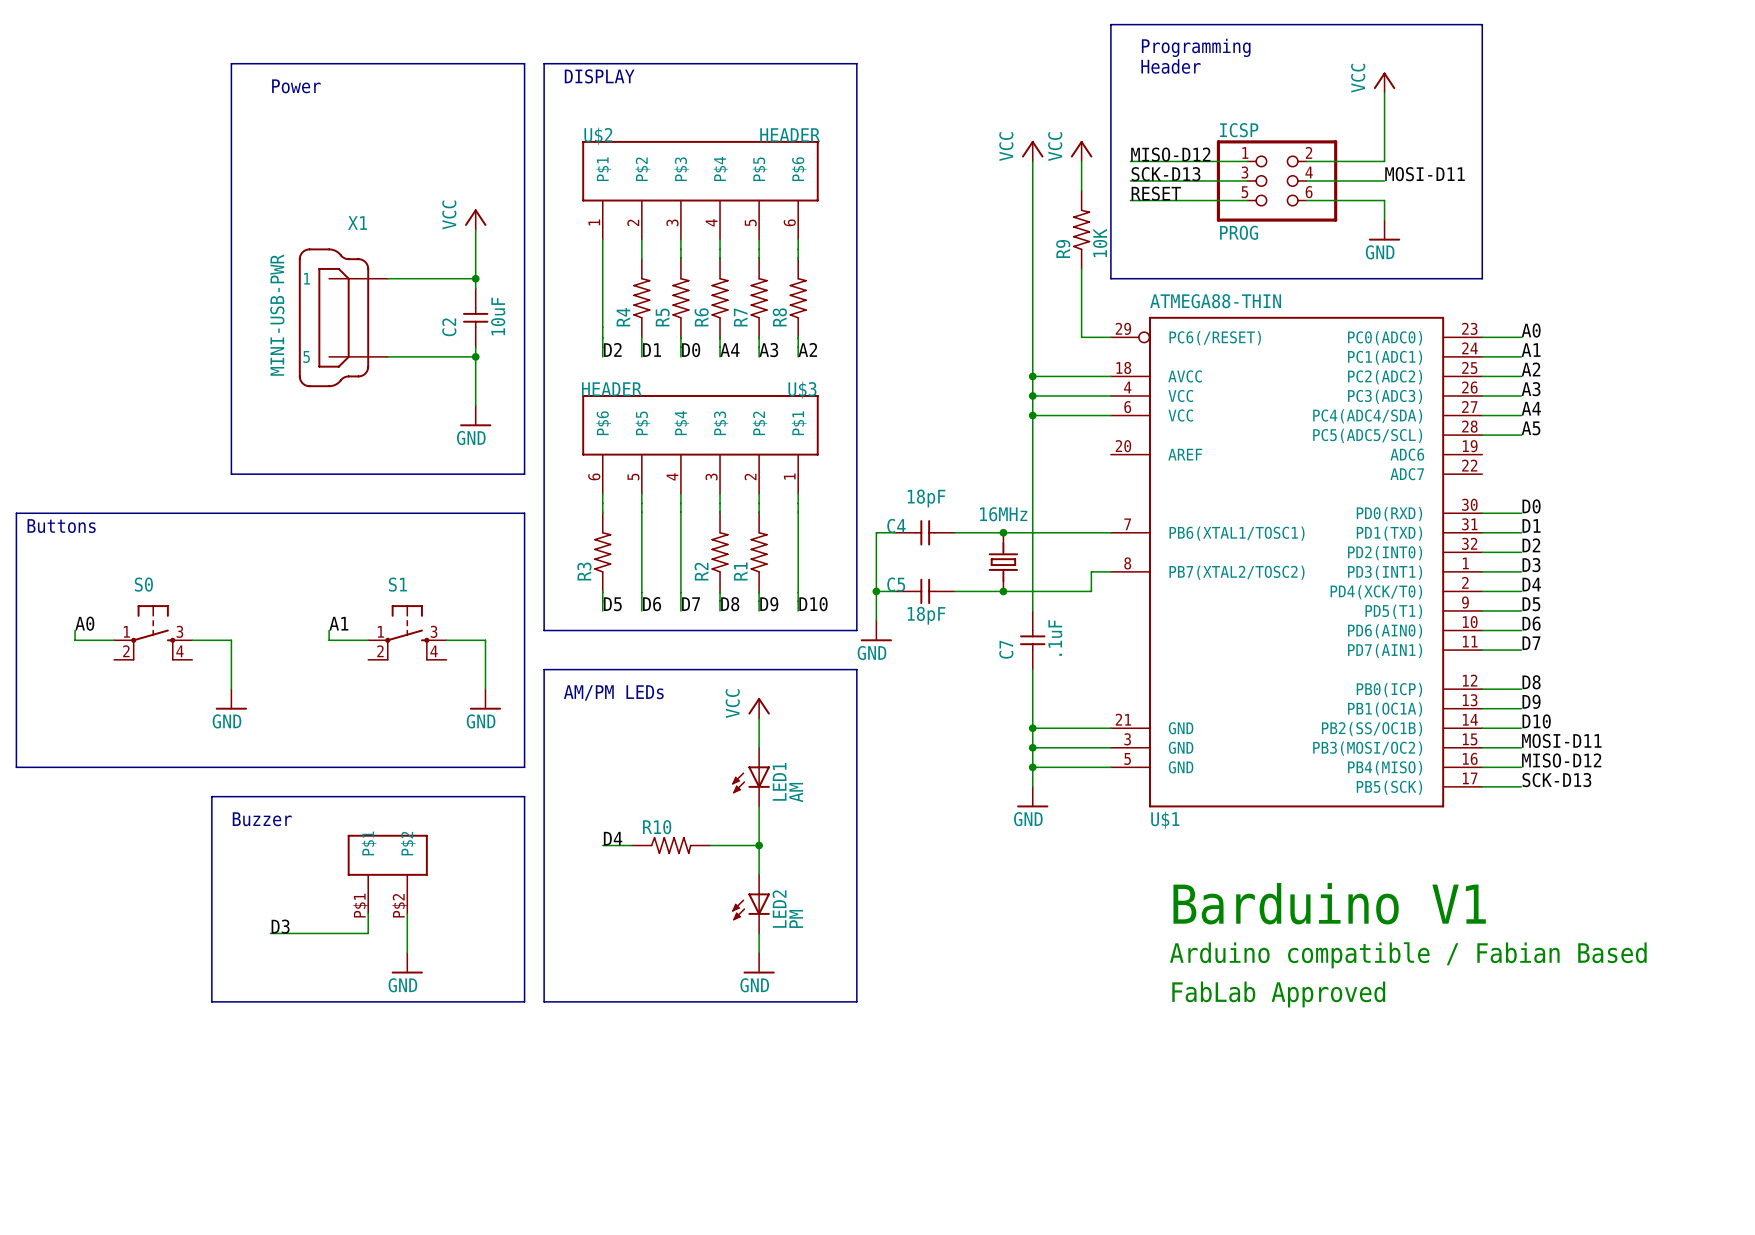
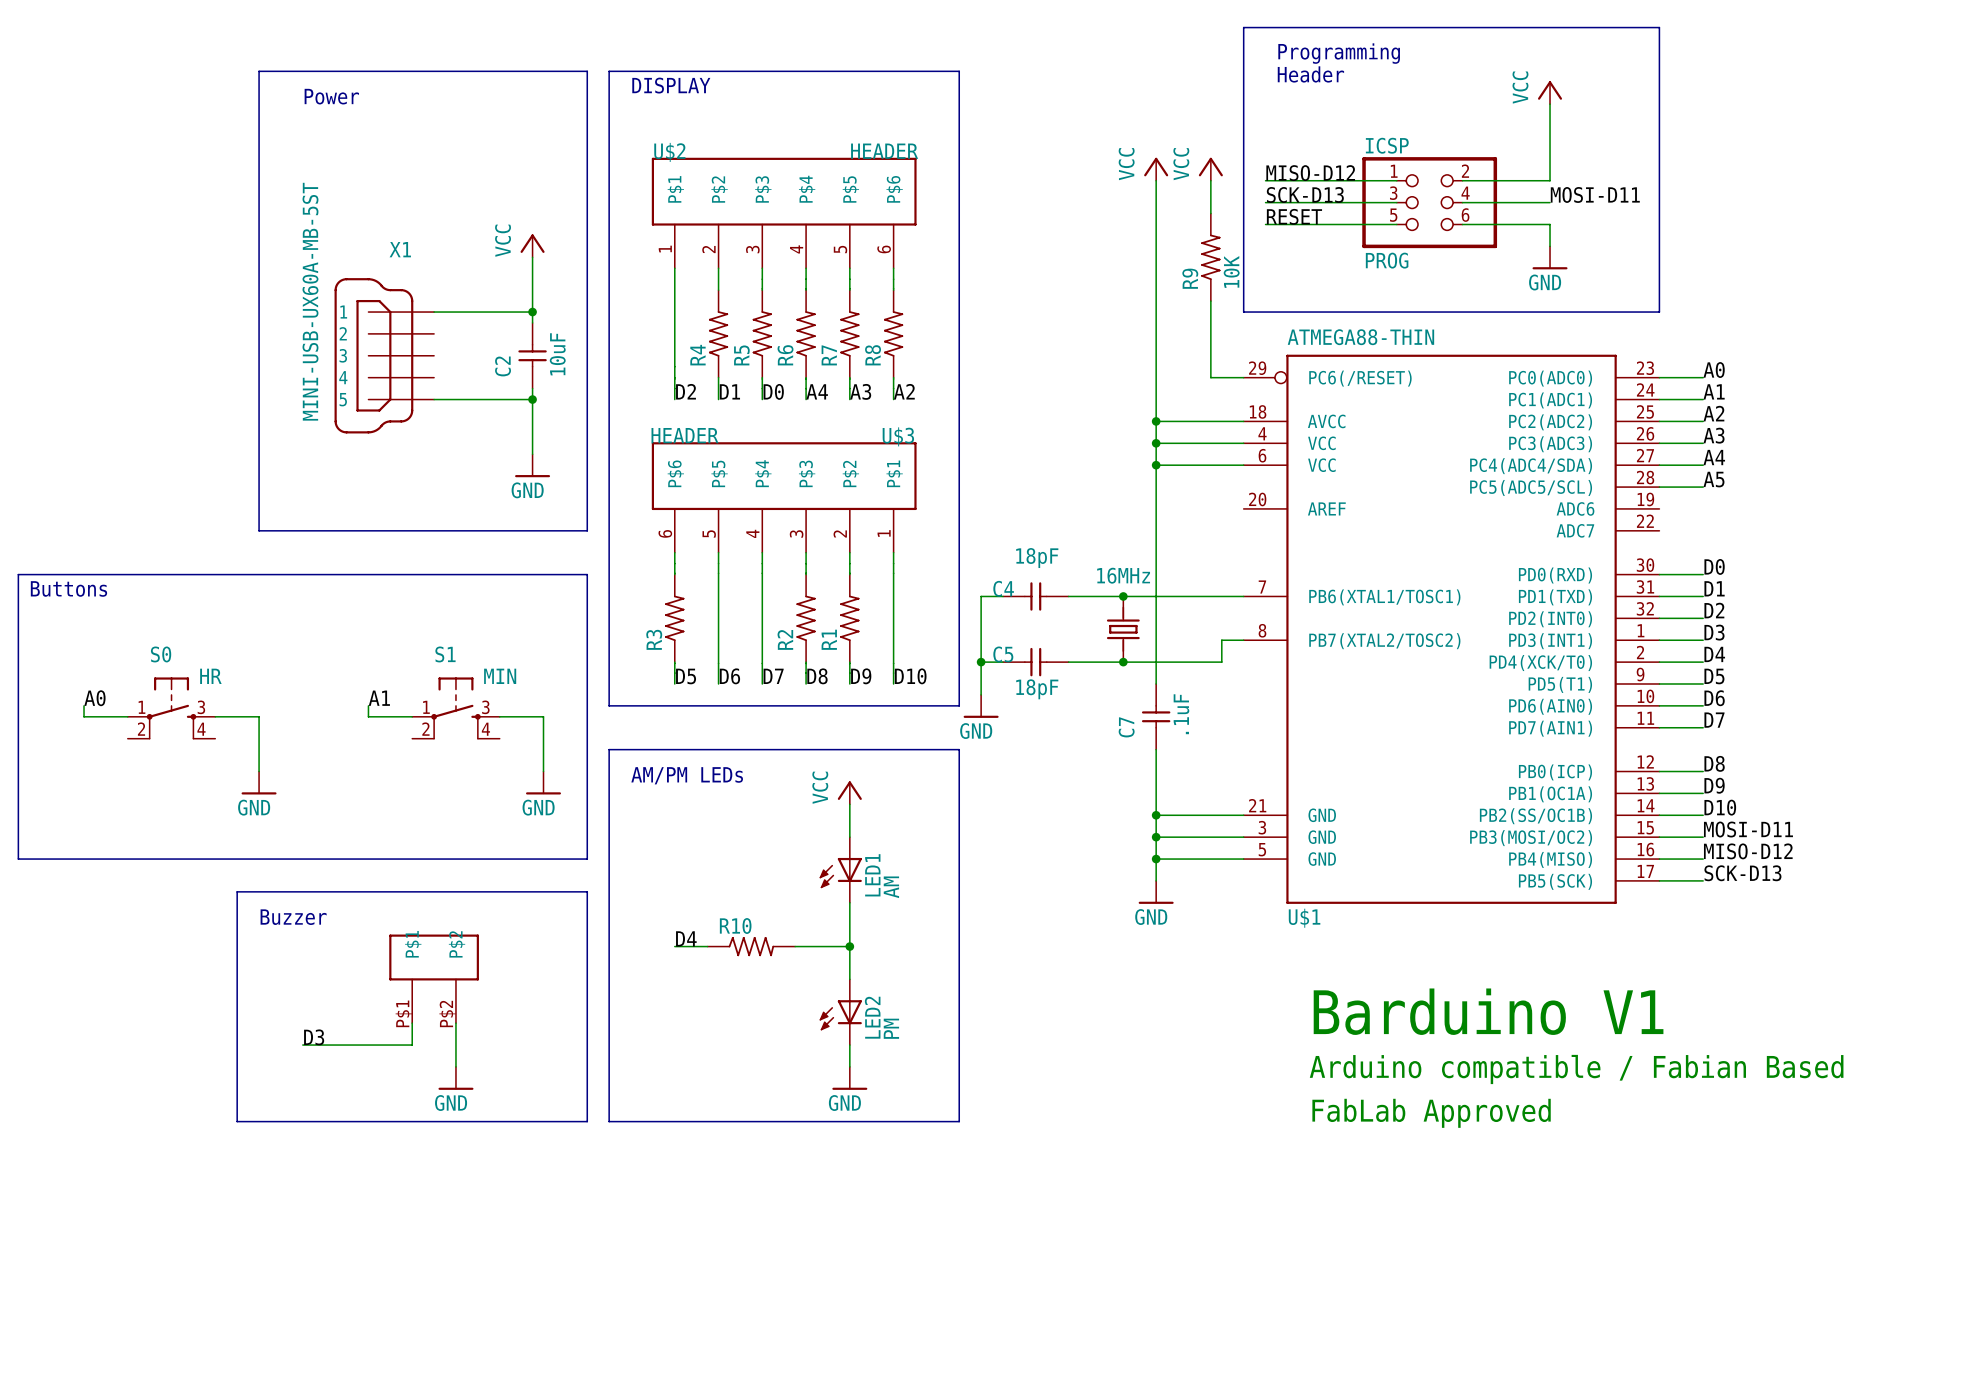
X1 symbol: [298, 248, 388, 388] -> [334, 278, 435, 434]
X1 value: MINI-USB-PWR (277, 315) -> MINI-USB-UX60A-MB-5ST (310, 301)
S0 value: none -> HR (210, 676)
S1 value: none -> MIN (500, 676)

